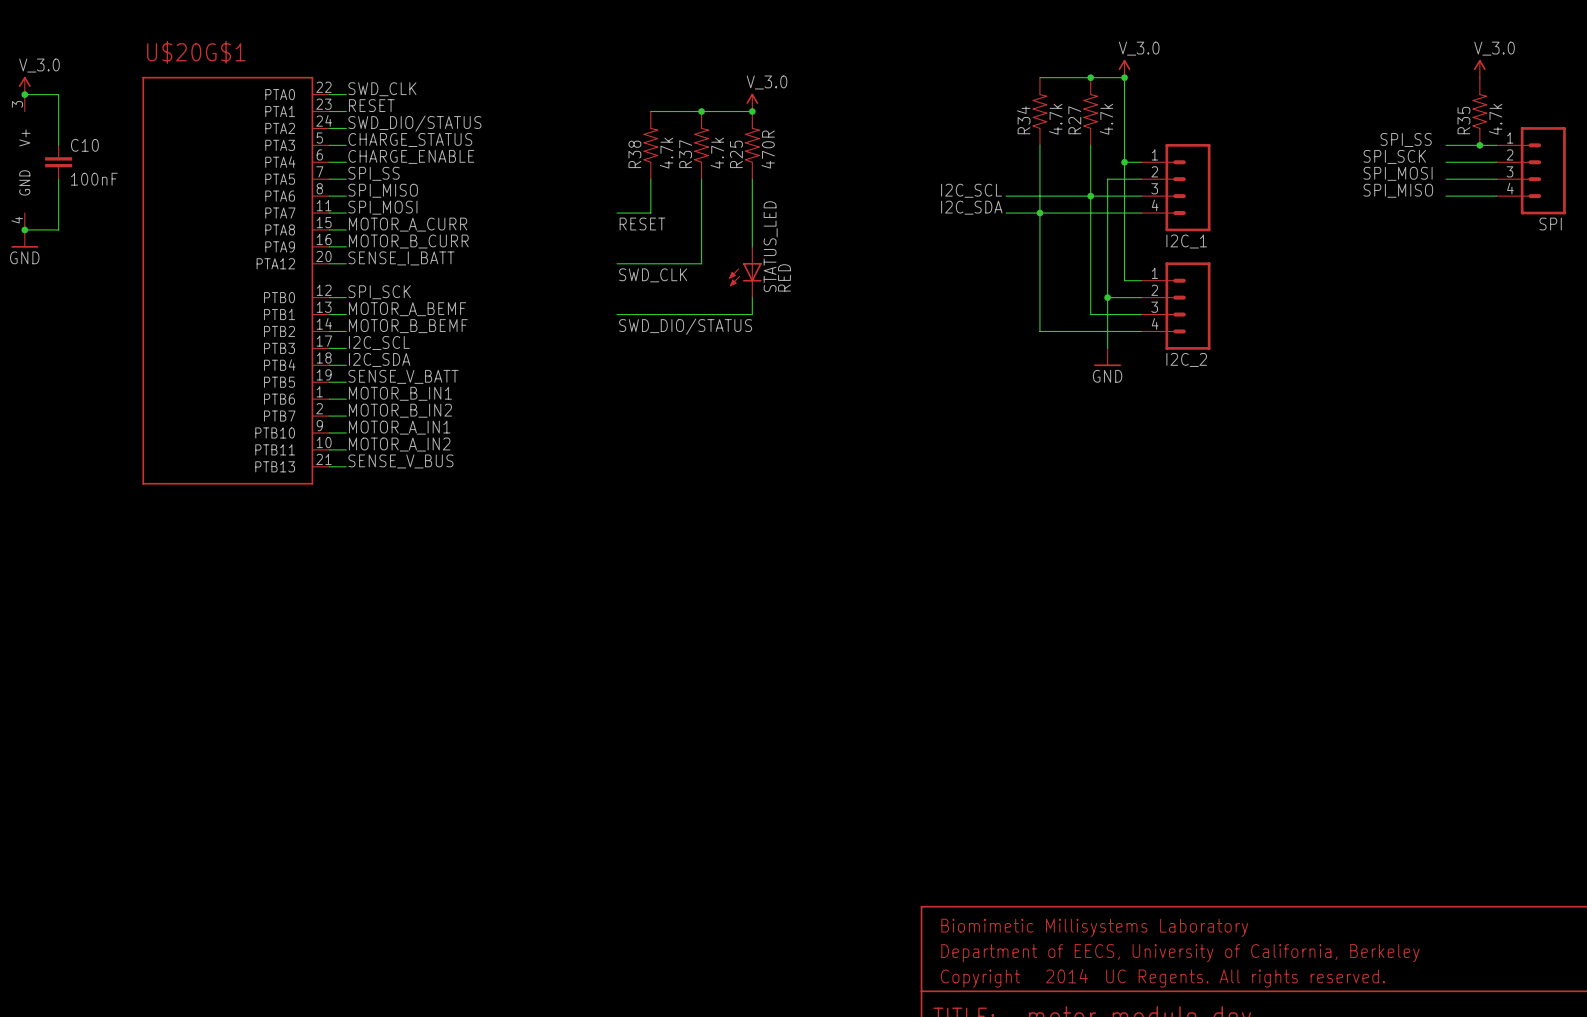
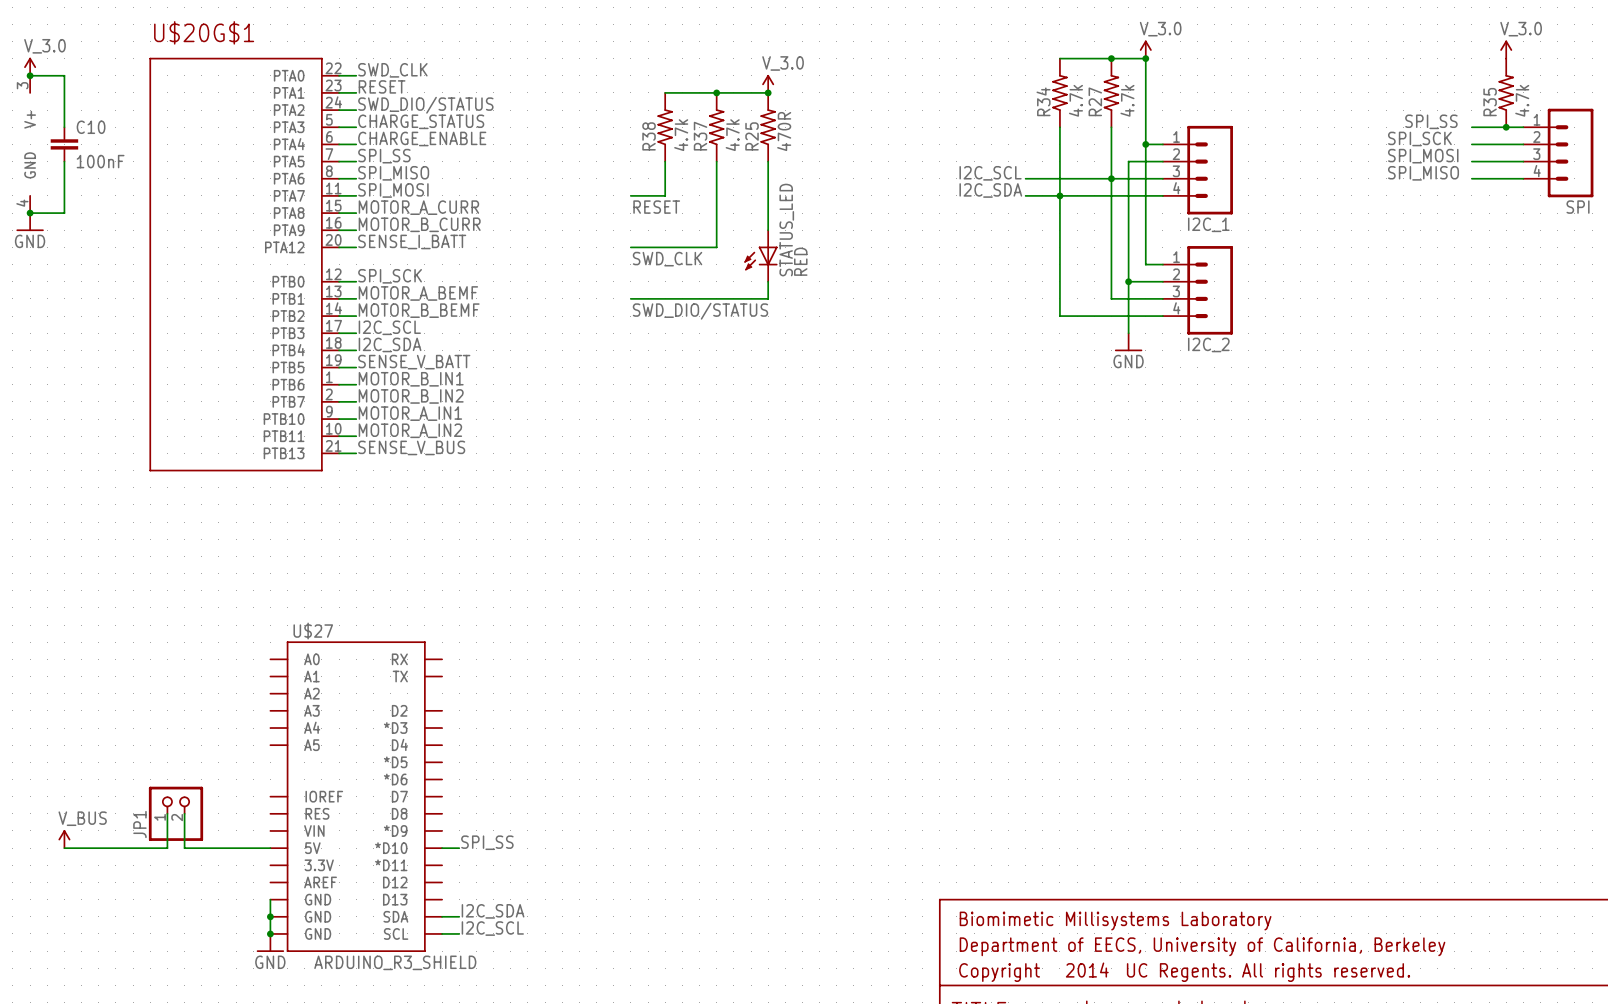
U$27: none -> ARDUINO_R3_SHIELD (356, 796)
wire: none -> (167, 813) (167, 848) (64, 848)
JP1: none -> (176, 813)
wire: none -> (184, 813) (184, 848) (270, 848)
power symbol: none -> V_BUS (64, 839)
label: none -> SPI_SS (487, 842)
wire: none -> (442, 848) (459, 848)
wire: none -> (270, 899) (270, 933)
label: none -> I2C_SDA (493, 911)
junction: none -> (270, 916)
wire: none -> (442, 916) (459, 916)
label: none -> I2C_SCL (492, 928)
junction: none -> (270, 933)
wire: none -> (442, 933) (459, 933)
power symbol: none -> GND (270, 942)

